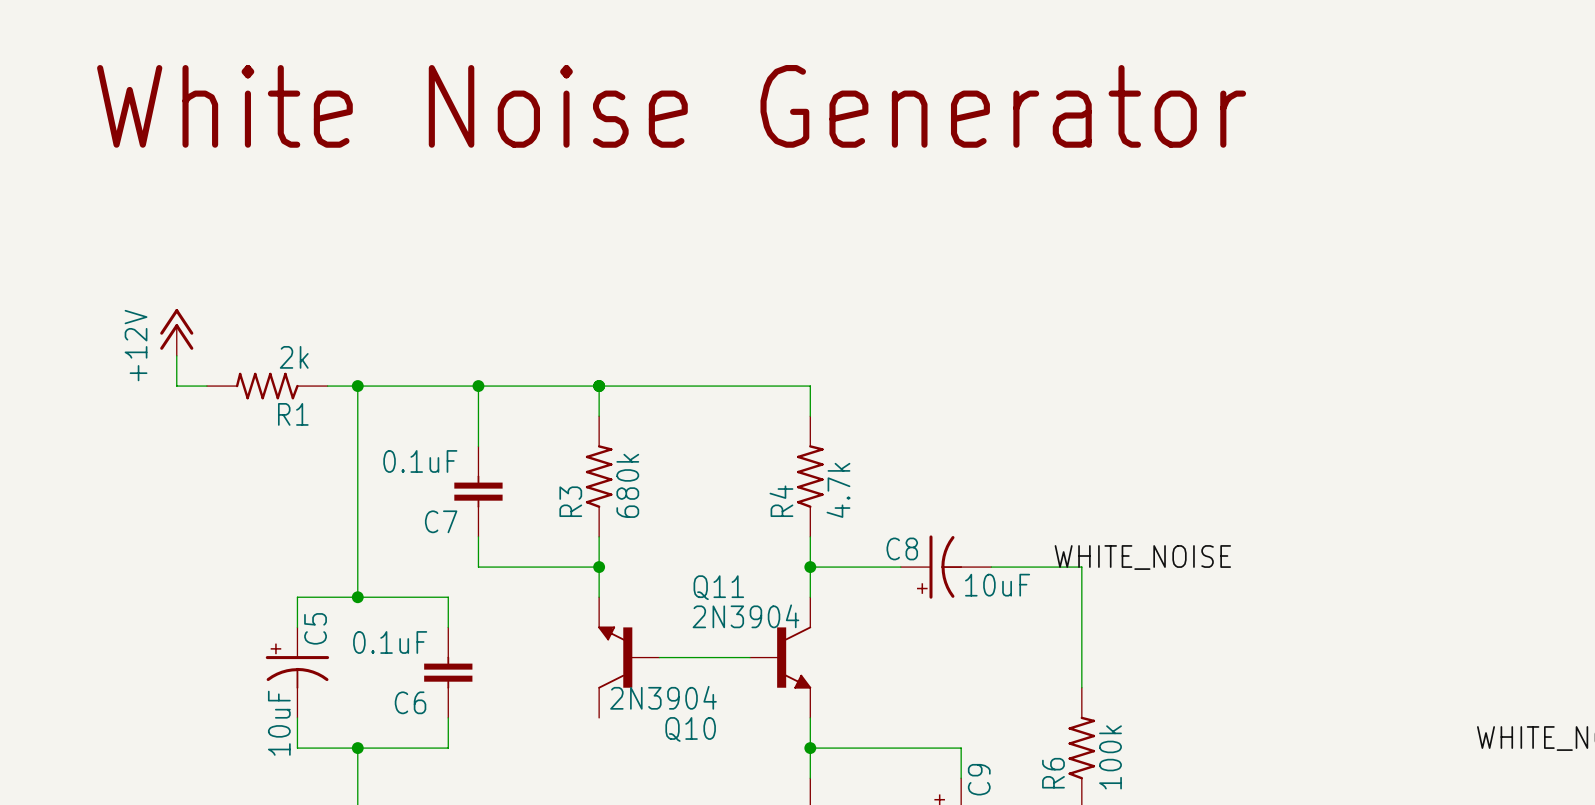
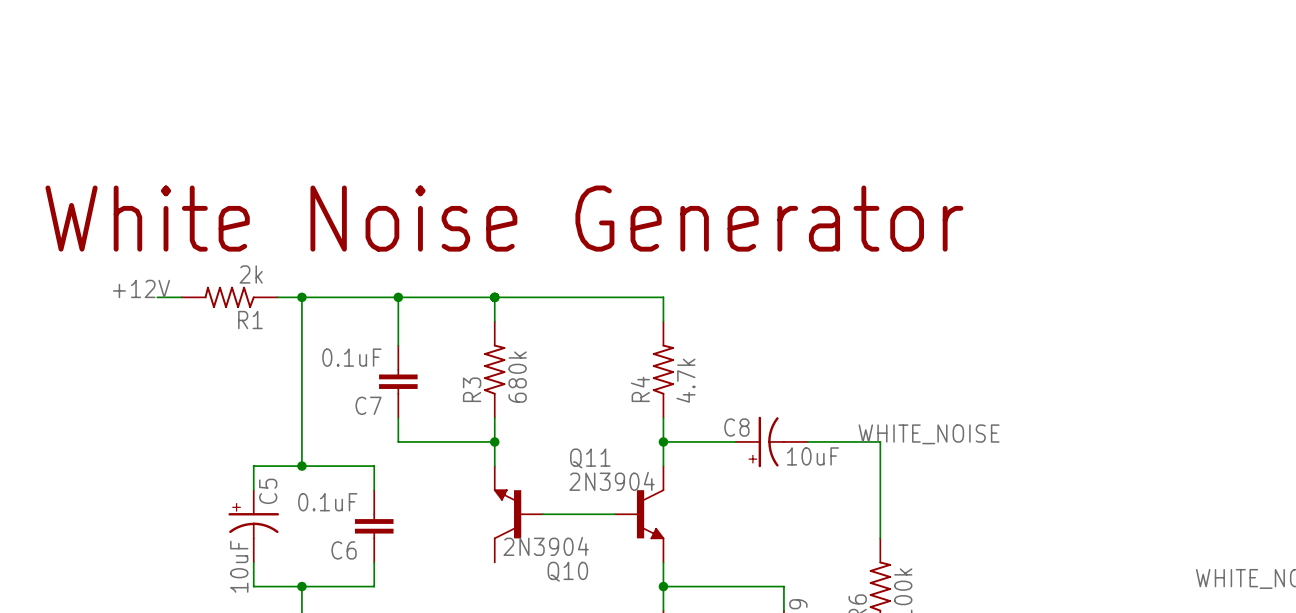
text position: White Noise Generator (671, 106) -> White Noise Generator (504, 218)
power symbol: +12V (176, 332) -> none
wire: (176, 355) (176, 386) -> none
label: none -> +12V (141, 288)

